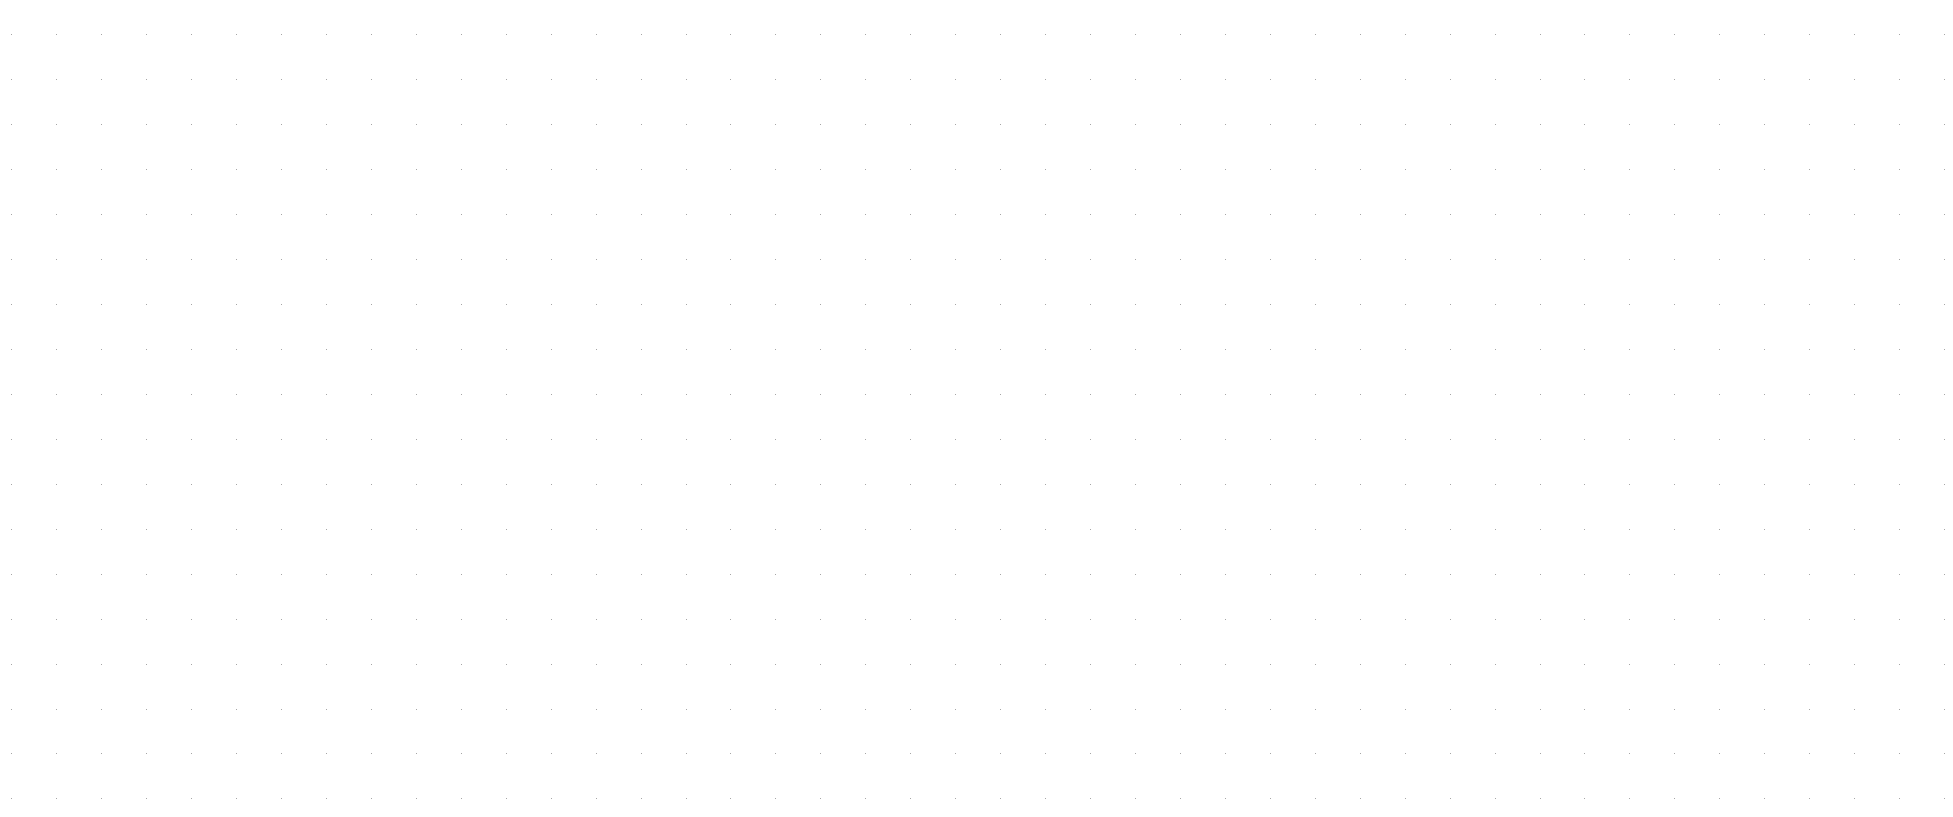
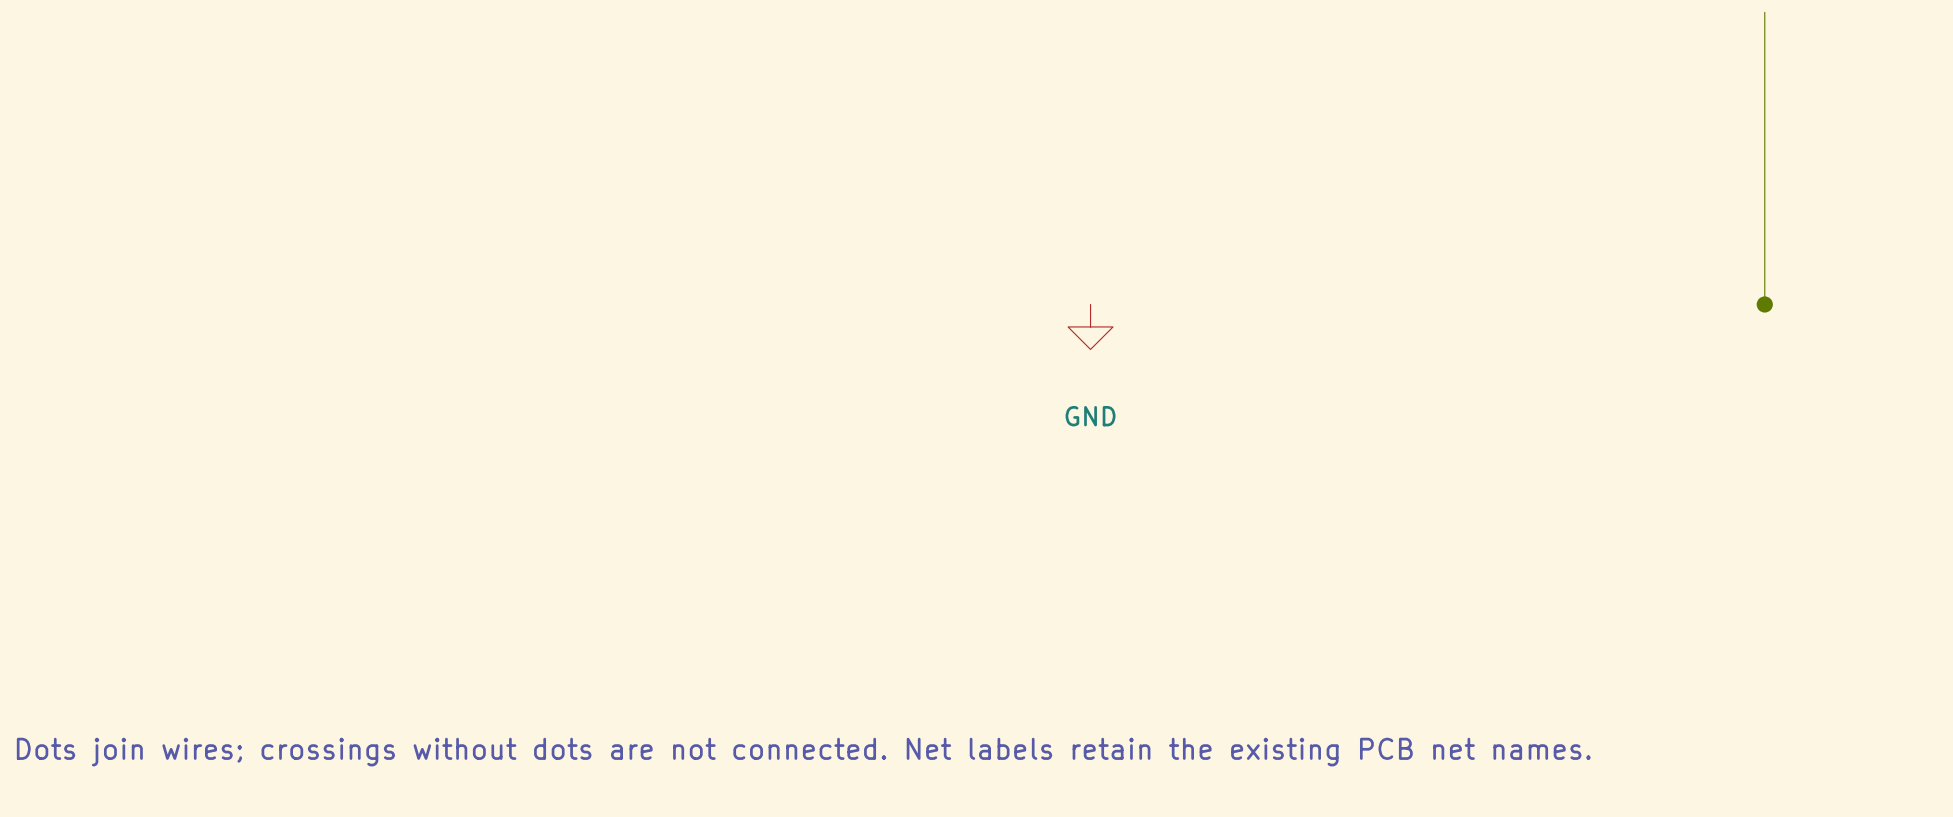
wire: none -> (1764, 12) (1764, 304)
junction: none -> (1764, 304)
power symbol: none -> GND (1090, 326)
text: none -> Dots join wires; crossings without dots are not connected. Net labels retain the existing PCB net names. (803, 752)

